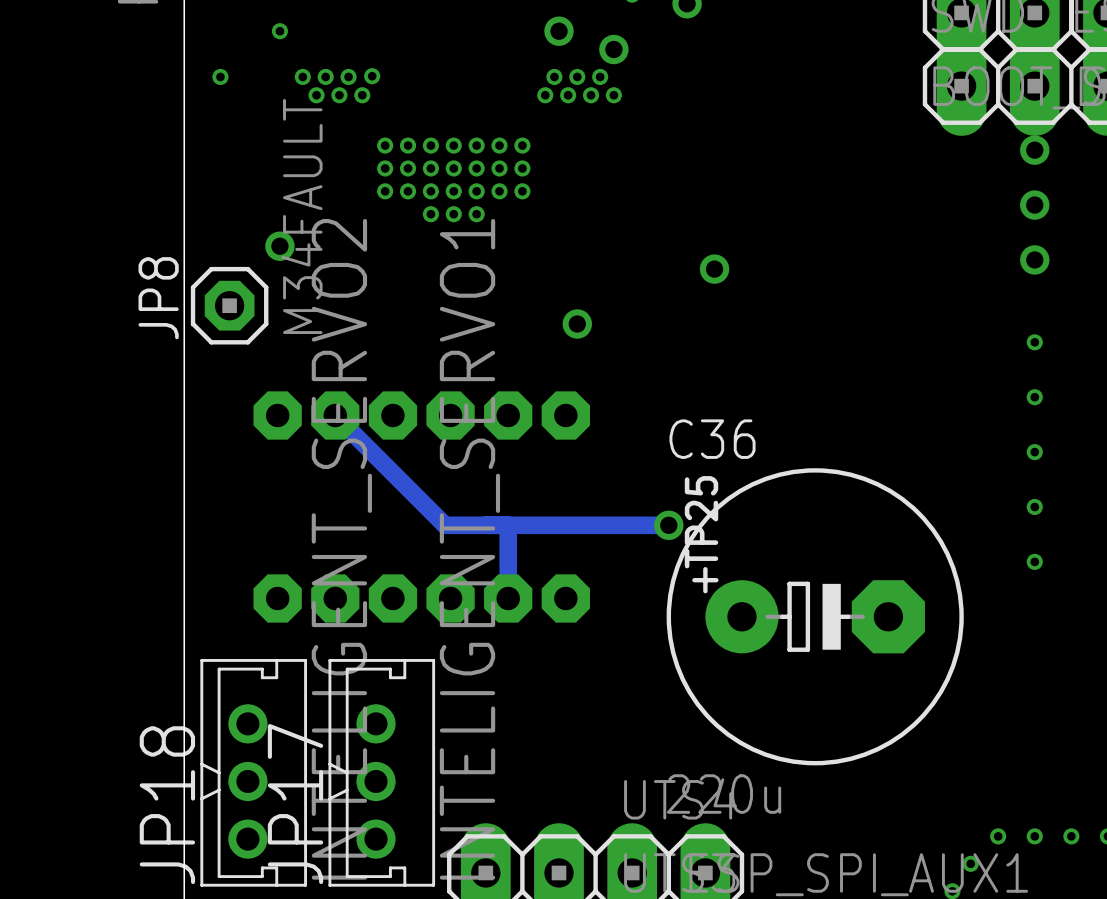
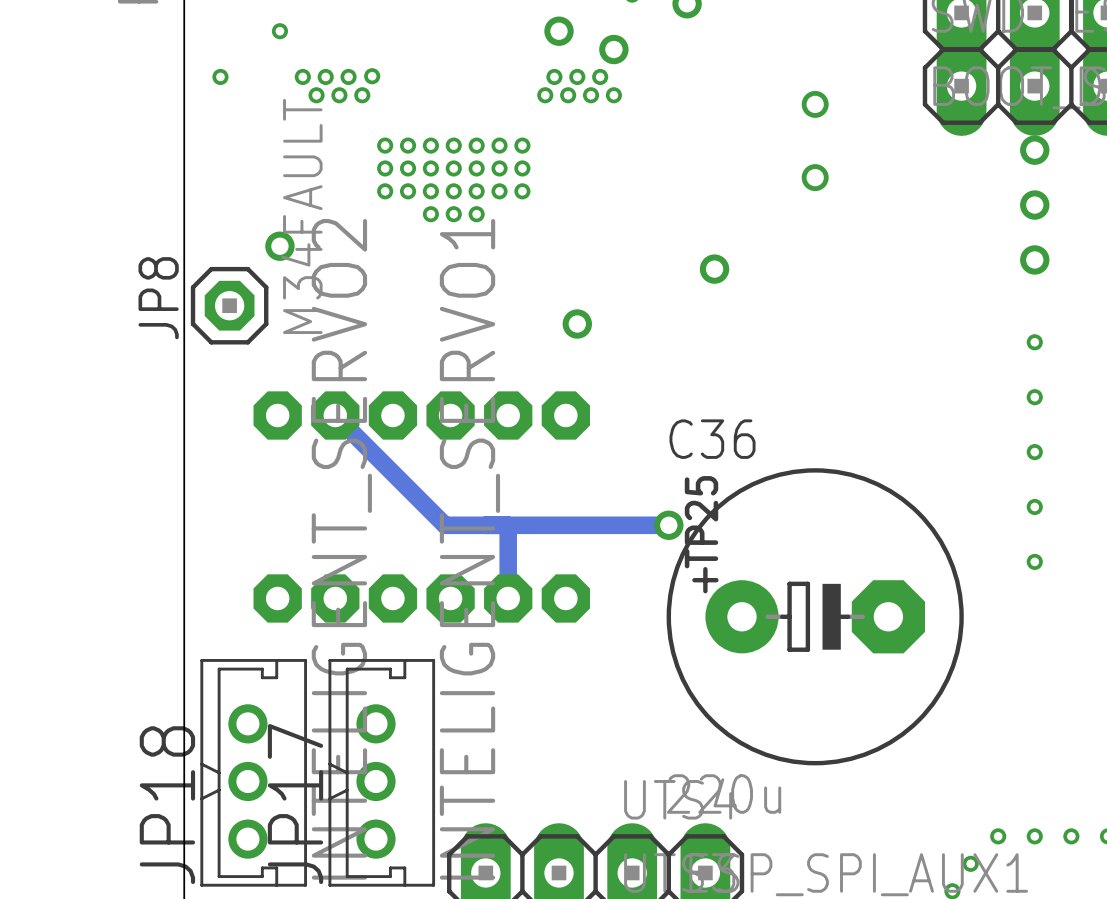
part: none -> (815, 104)
part: none -> (815, 177)

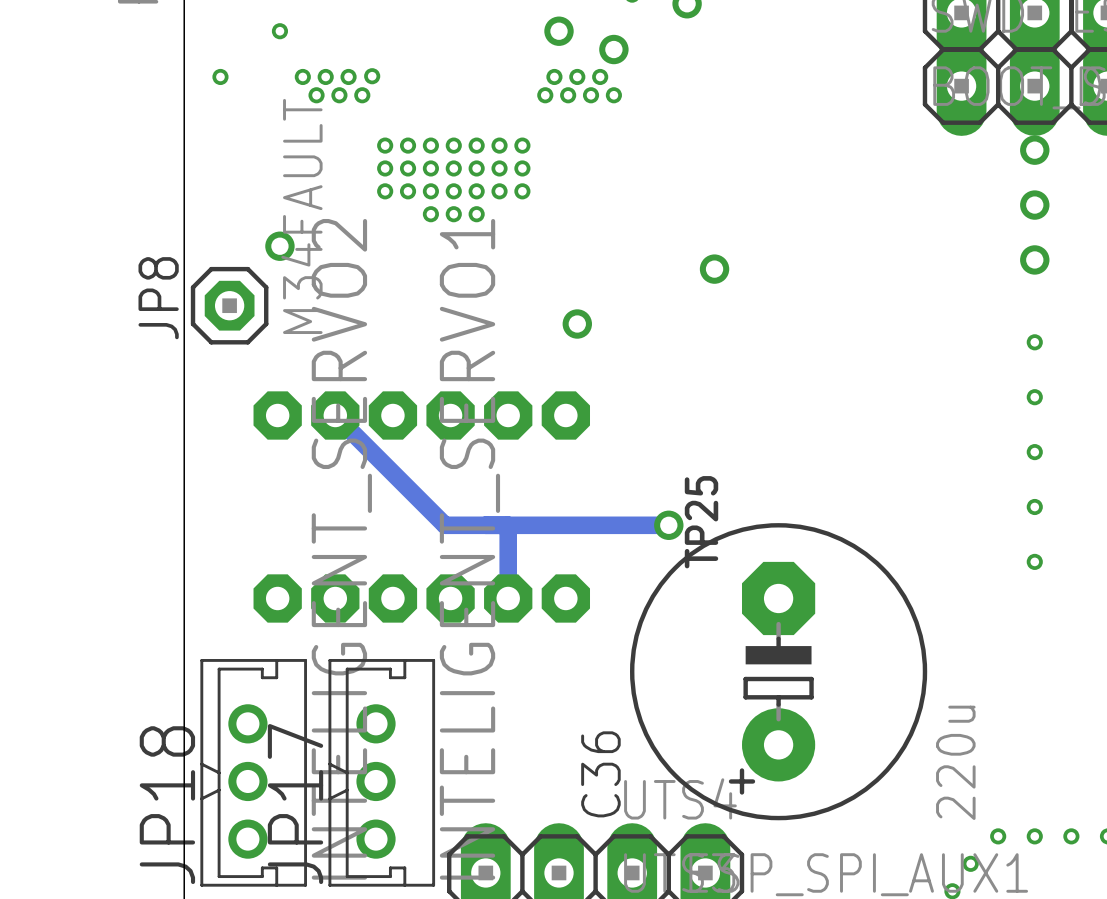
part: (815, 104) -> none
part: (815, 177) -> none
C36 rotation: 0° (815, 616) -> 90° counterclockwise (778, 671)

